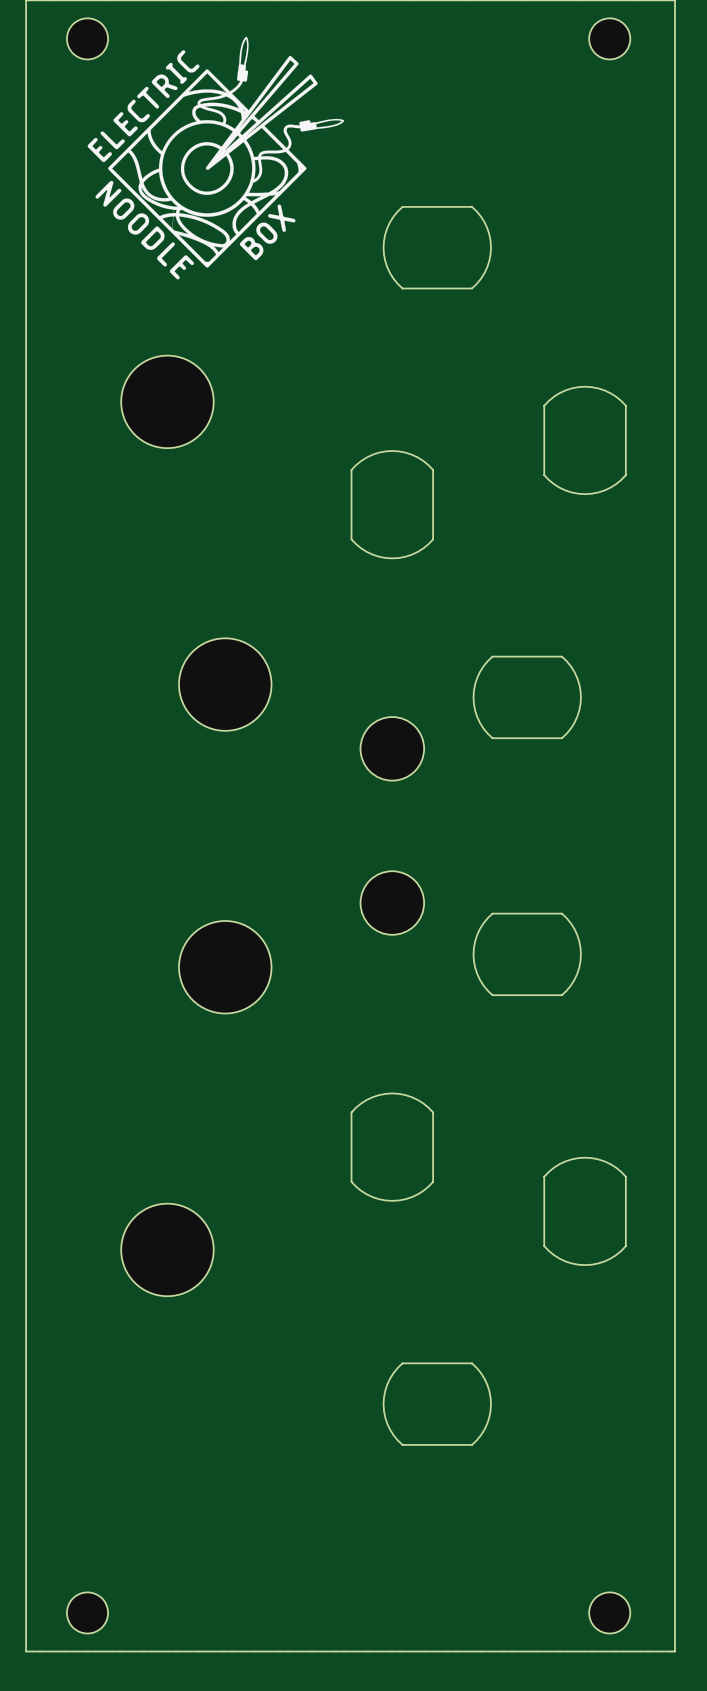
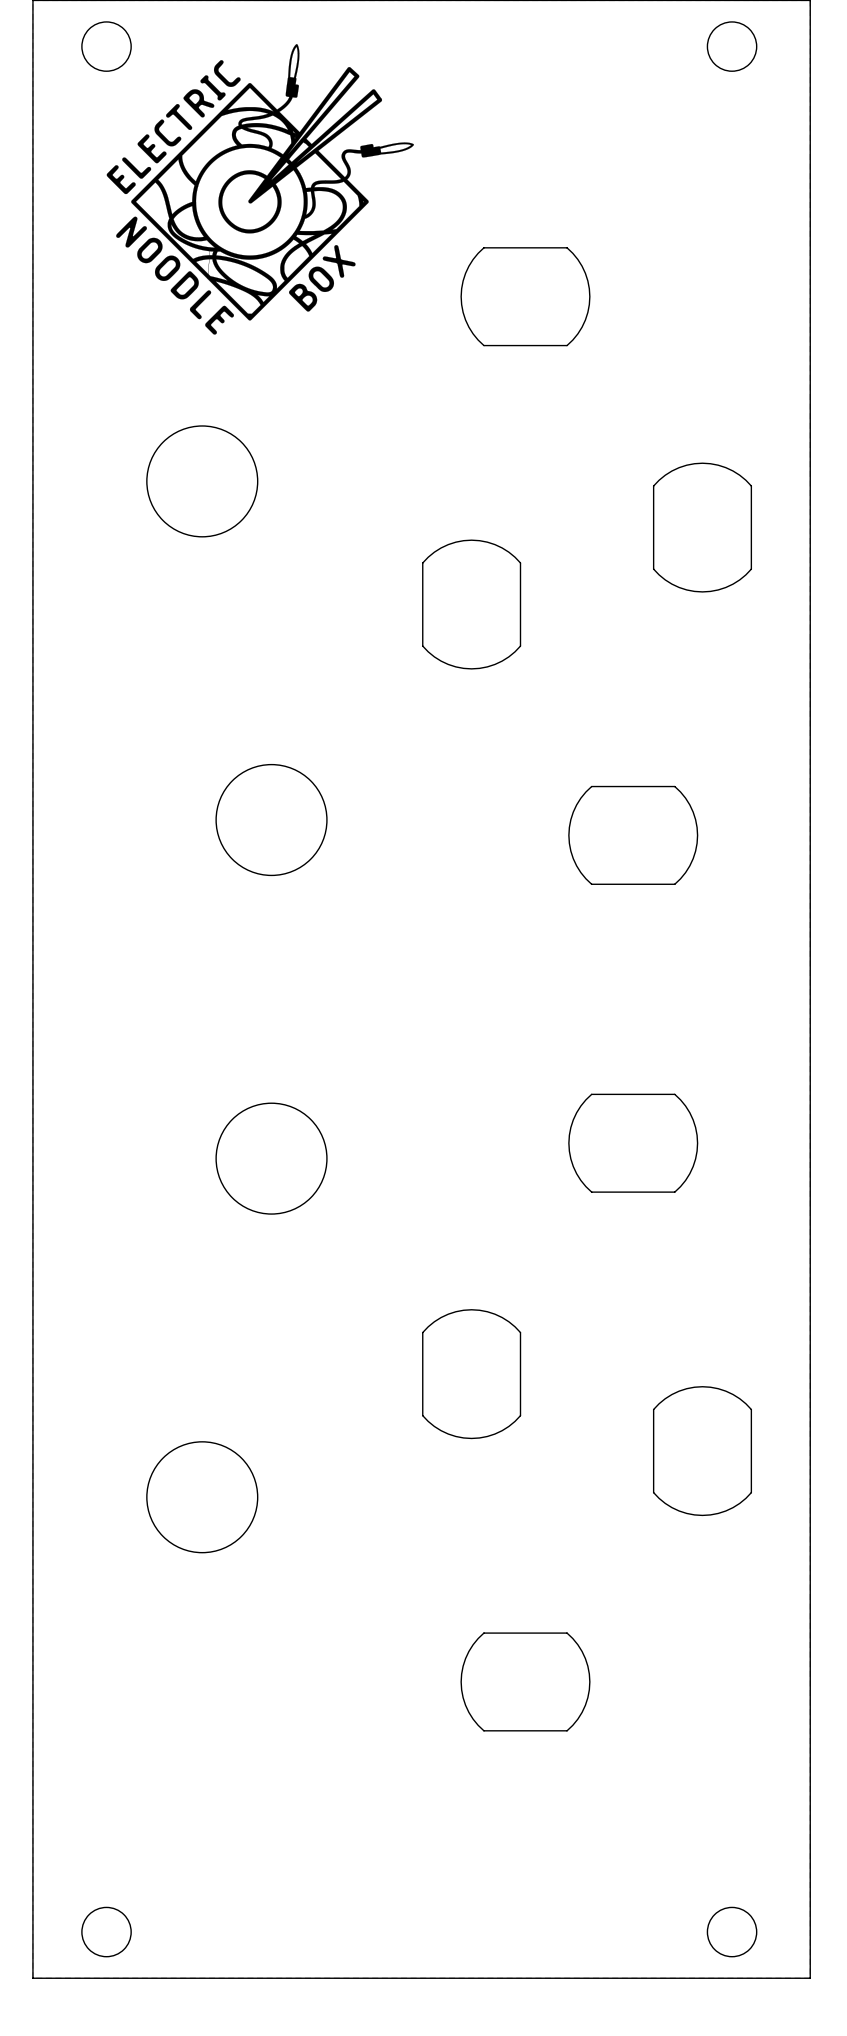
part: (392, 748) -> none
part: (392, 903) -> none

